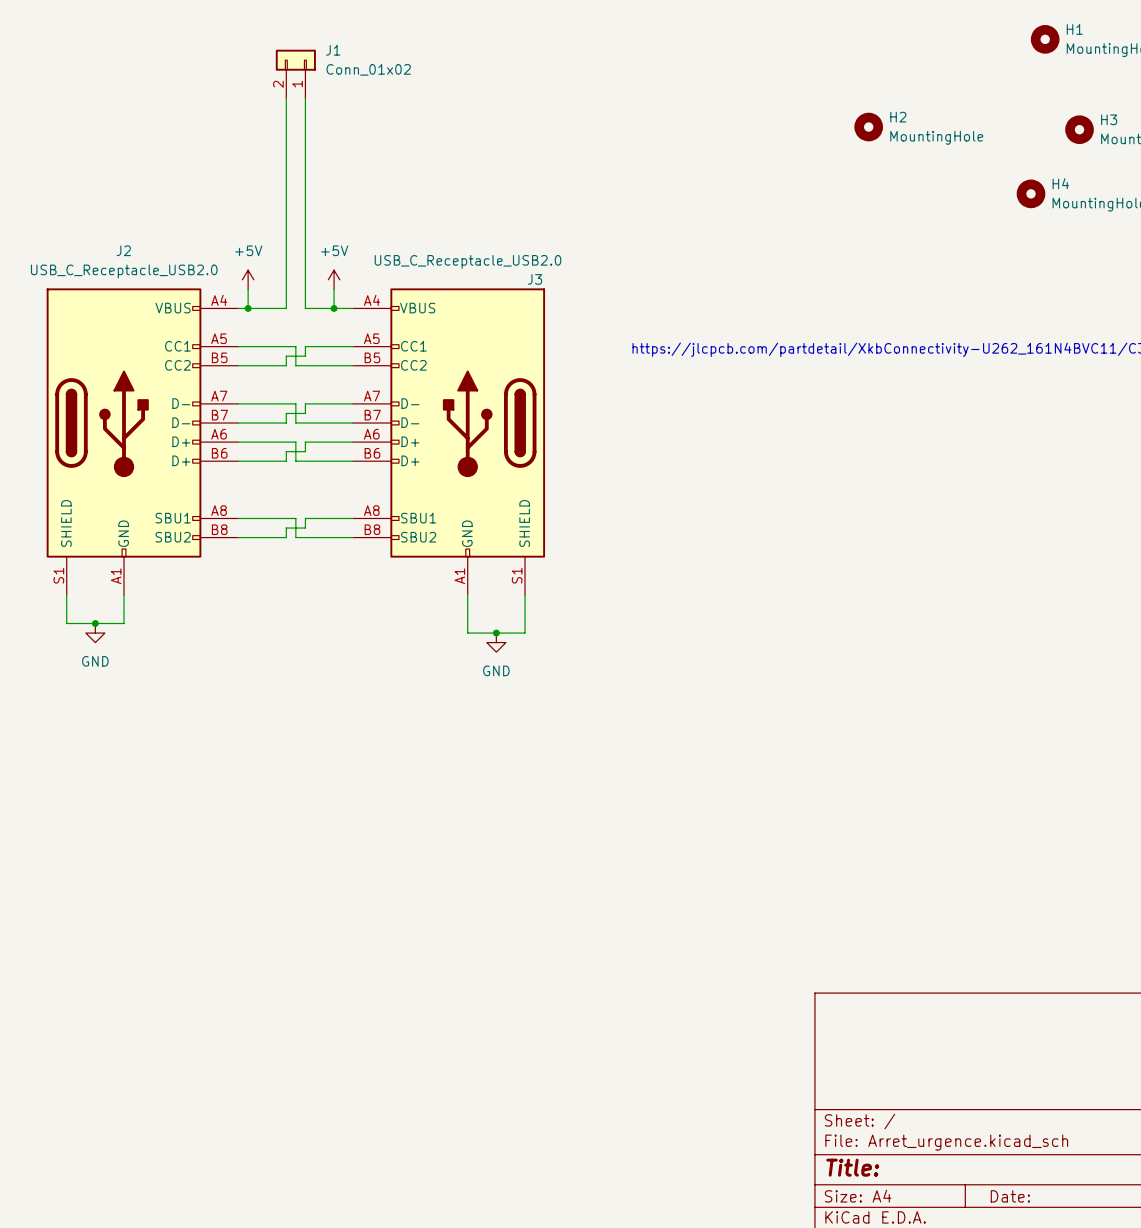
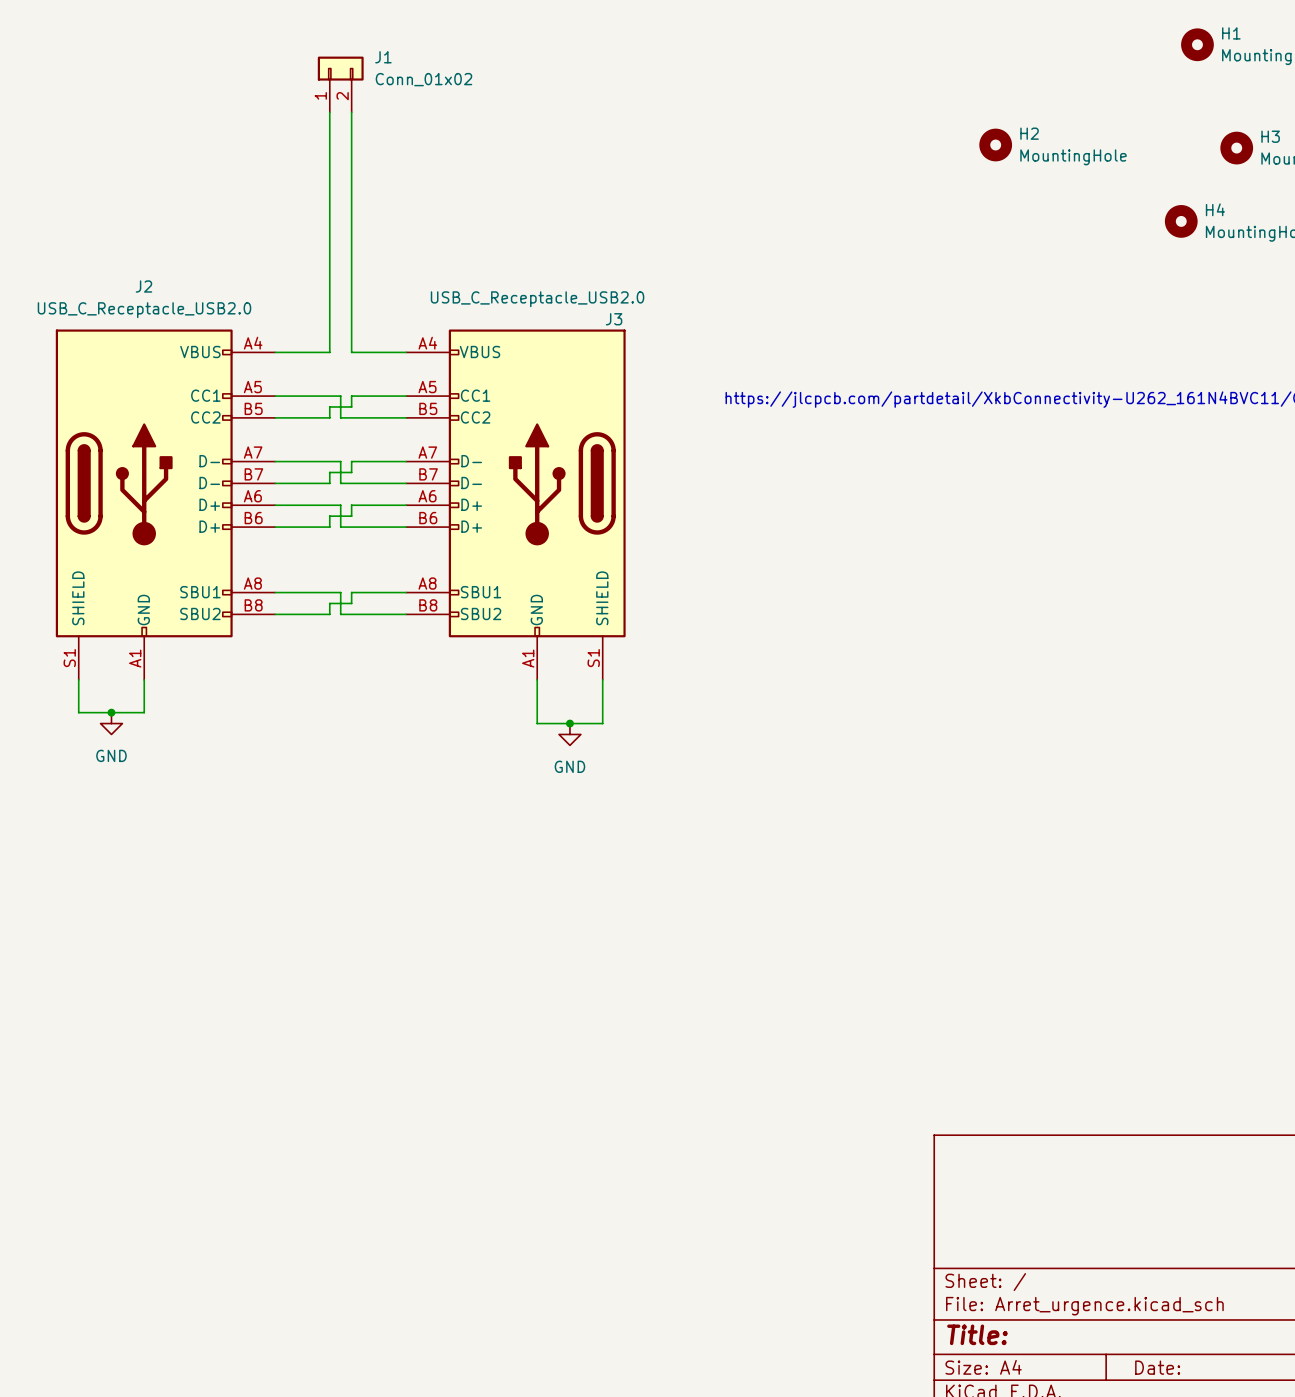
J1 flip: as is (295, 60) -> left-right (340, 68)
power symbol: +5V (248, 279) -> none
power symbol: +5V (334, 279) -> none
wire: (248, 289) (248, 308) -> none
wire: (334, 289) (334, 308) -> none
junction: (248, 308) -> none
junction: (334, 308) -> none

